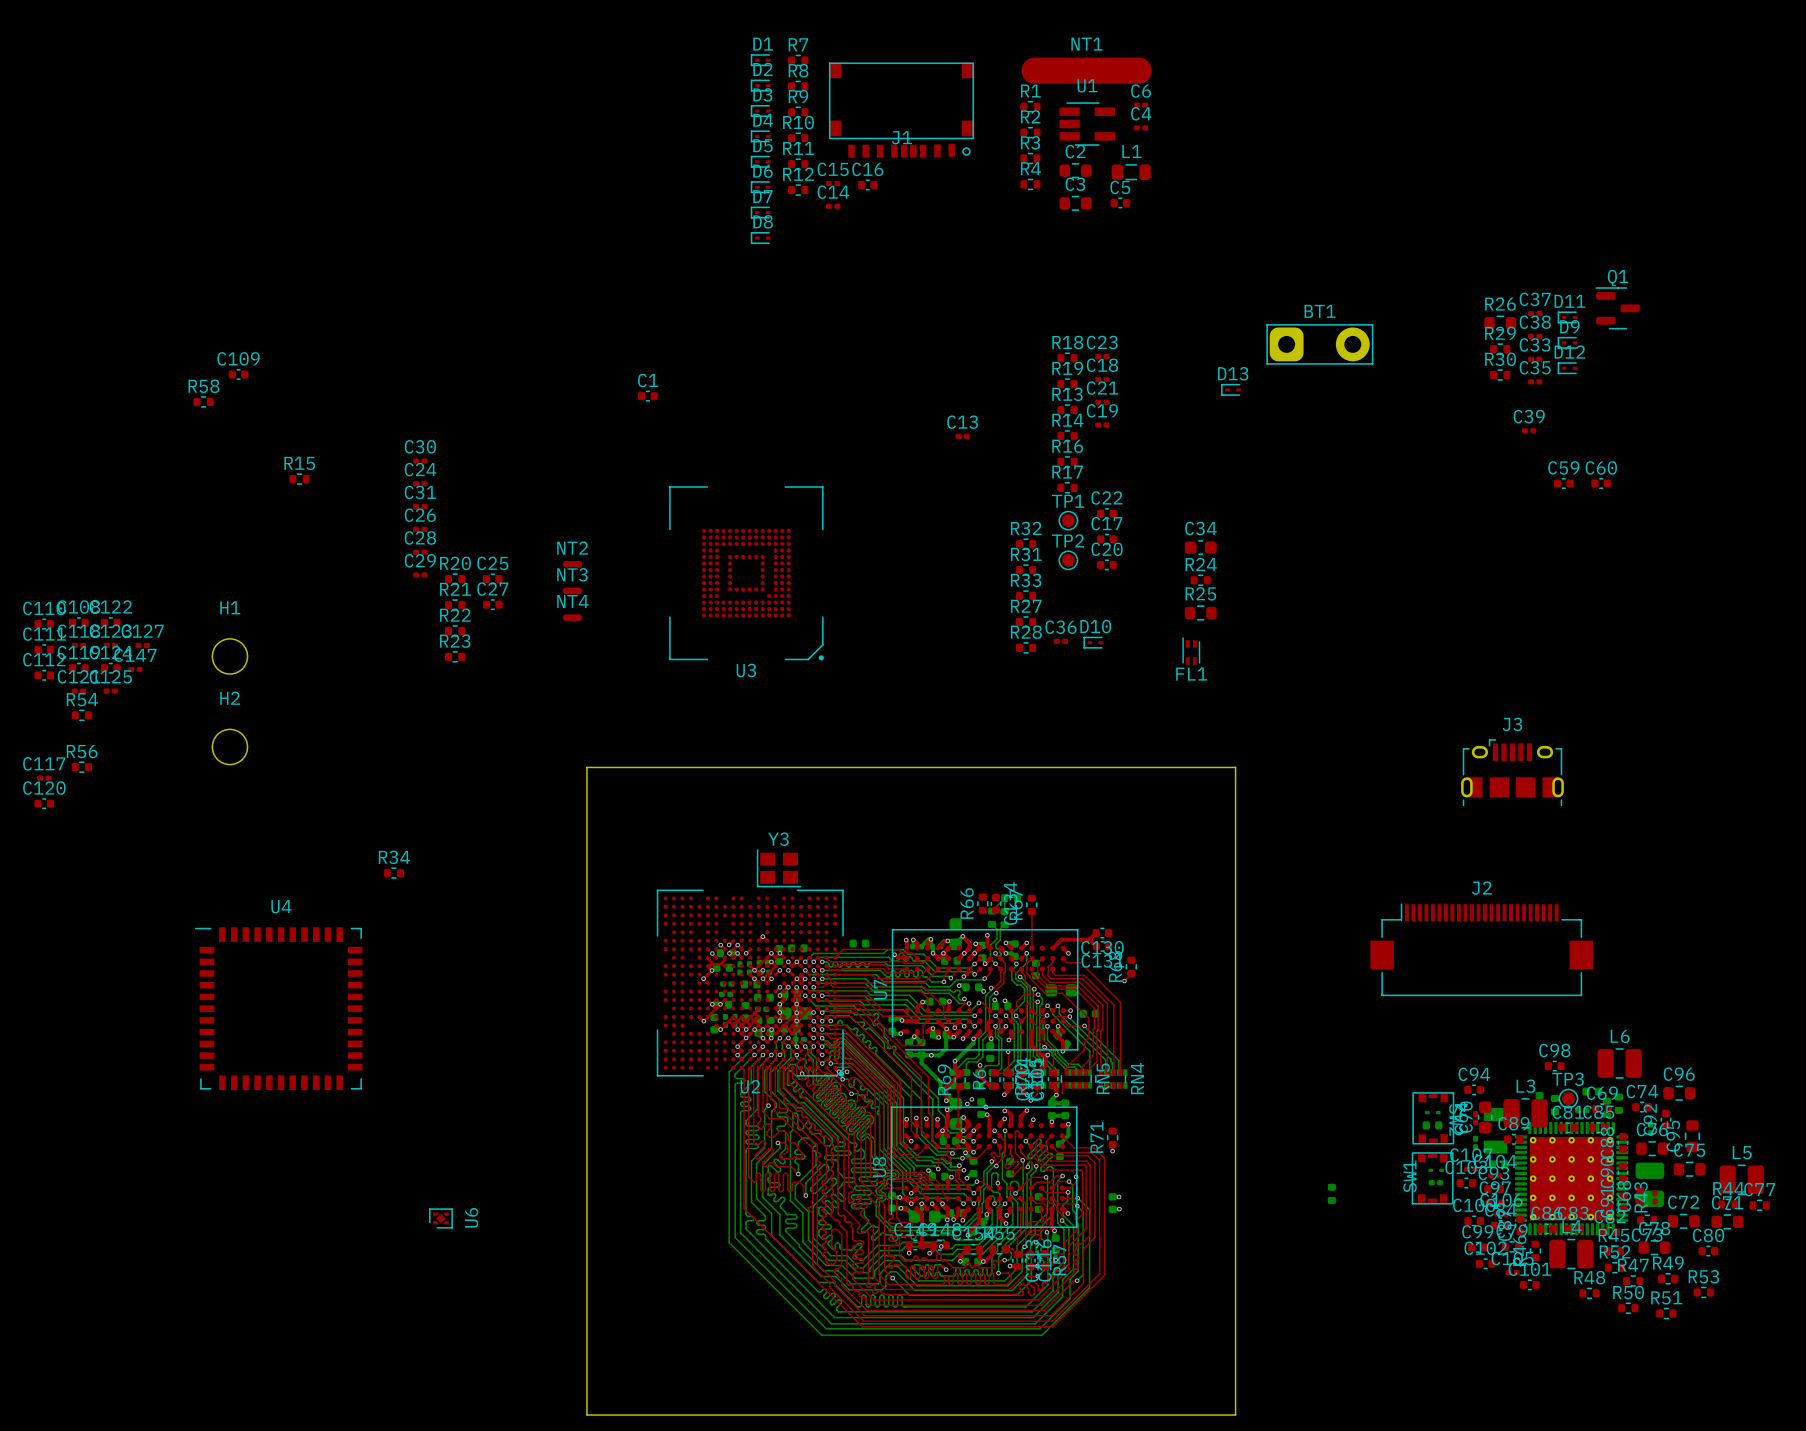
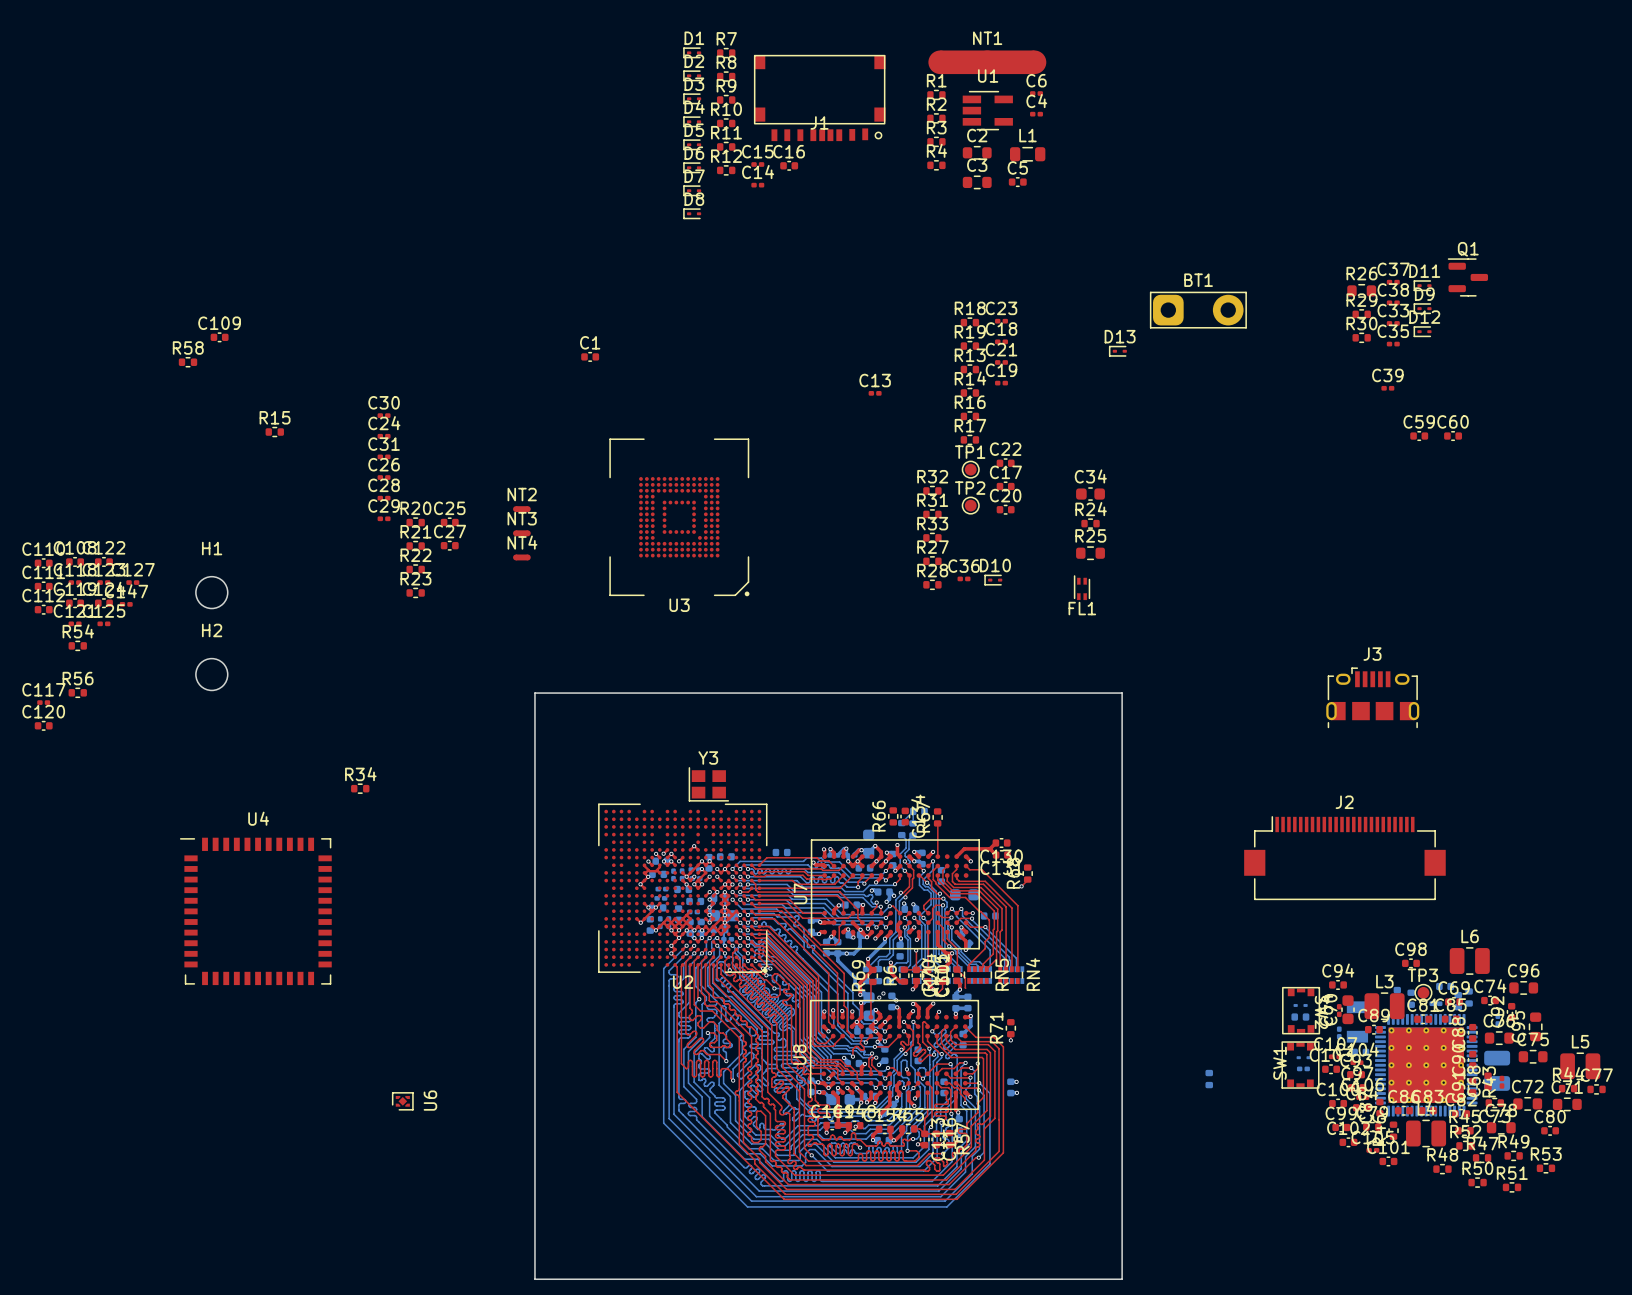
bottom track: none -> (889, 893) (889, 899) (886, 901)
via: none -> (886, 901)

